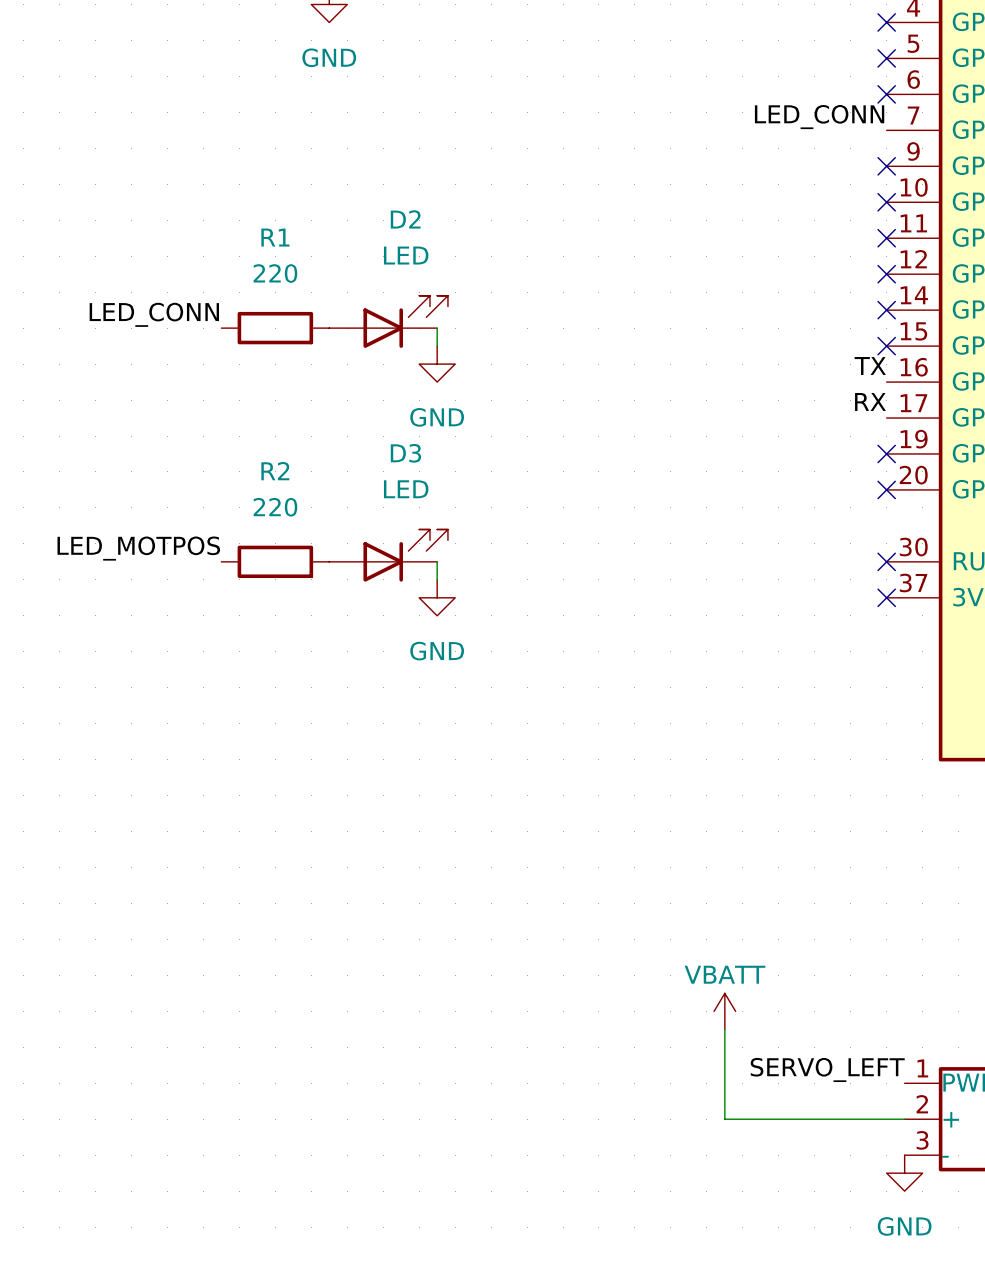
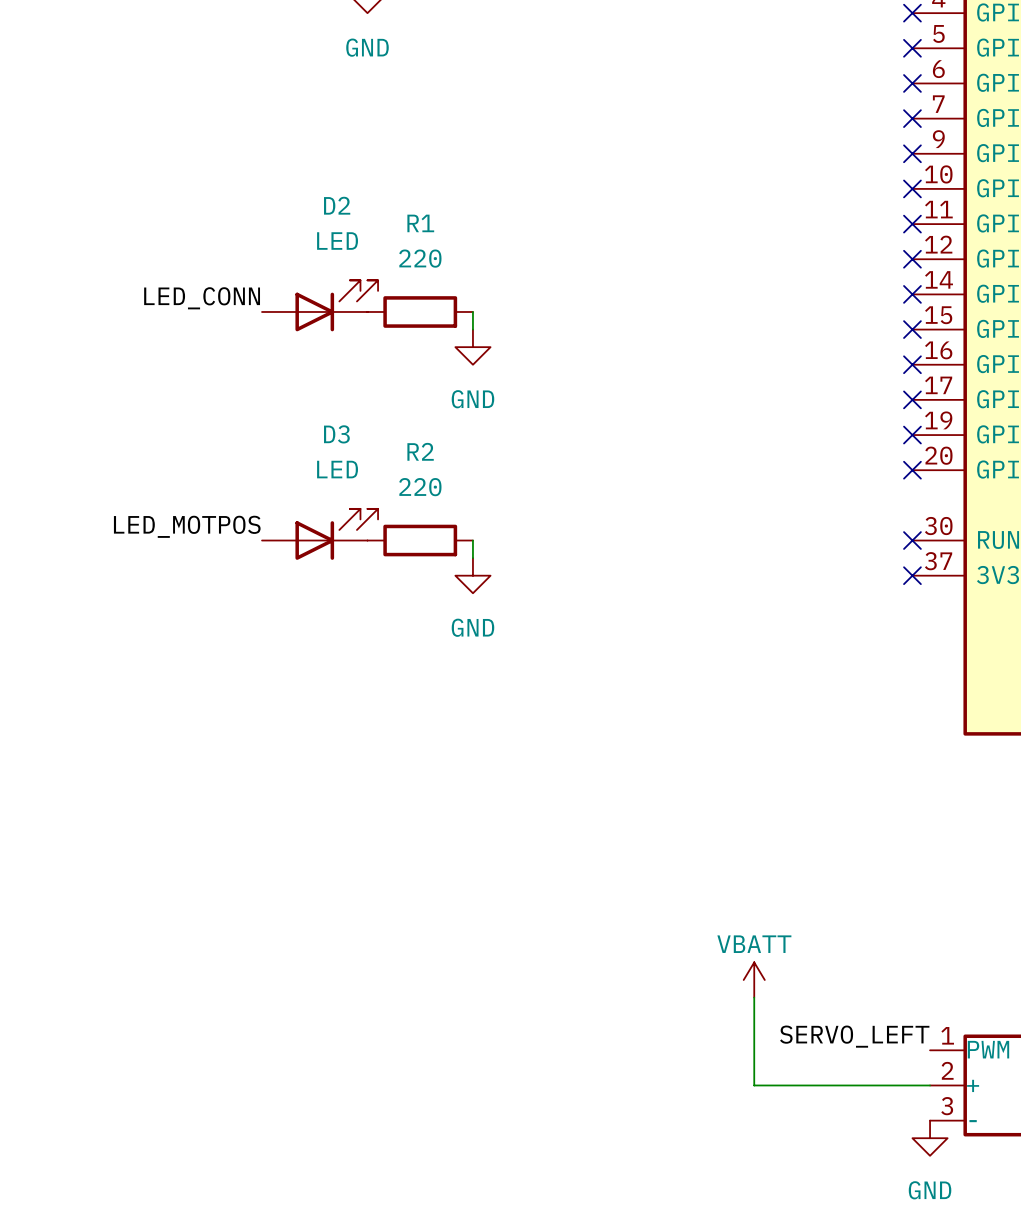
label: LED_CONN (819, 117) -> none
no-connect mark: none -> (912, 118)
D2 position: (388, 321) -> (320, 305)
R1 position: (275, 328) -> (420, 311)
label: TX (870, 366) -> none
no-connect mark: none -> (912, 364)
label: RX (870, 401) -> none
no-connect mark: none -> (912, 399)
D3 position: (388, 555) -> (320, 534)
R2 position: (275, 561) -> (420, 540)

